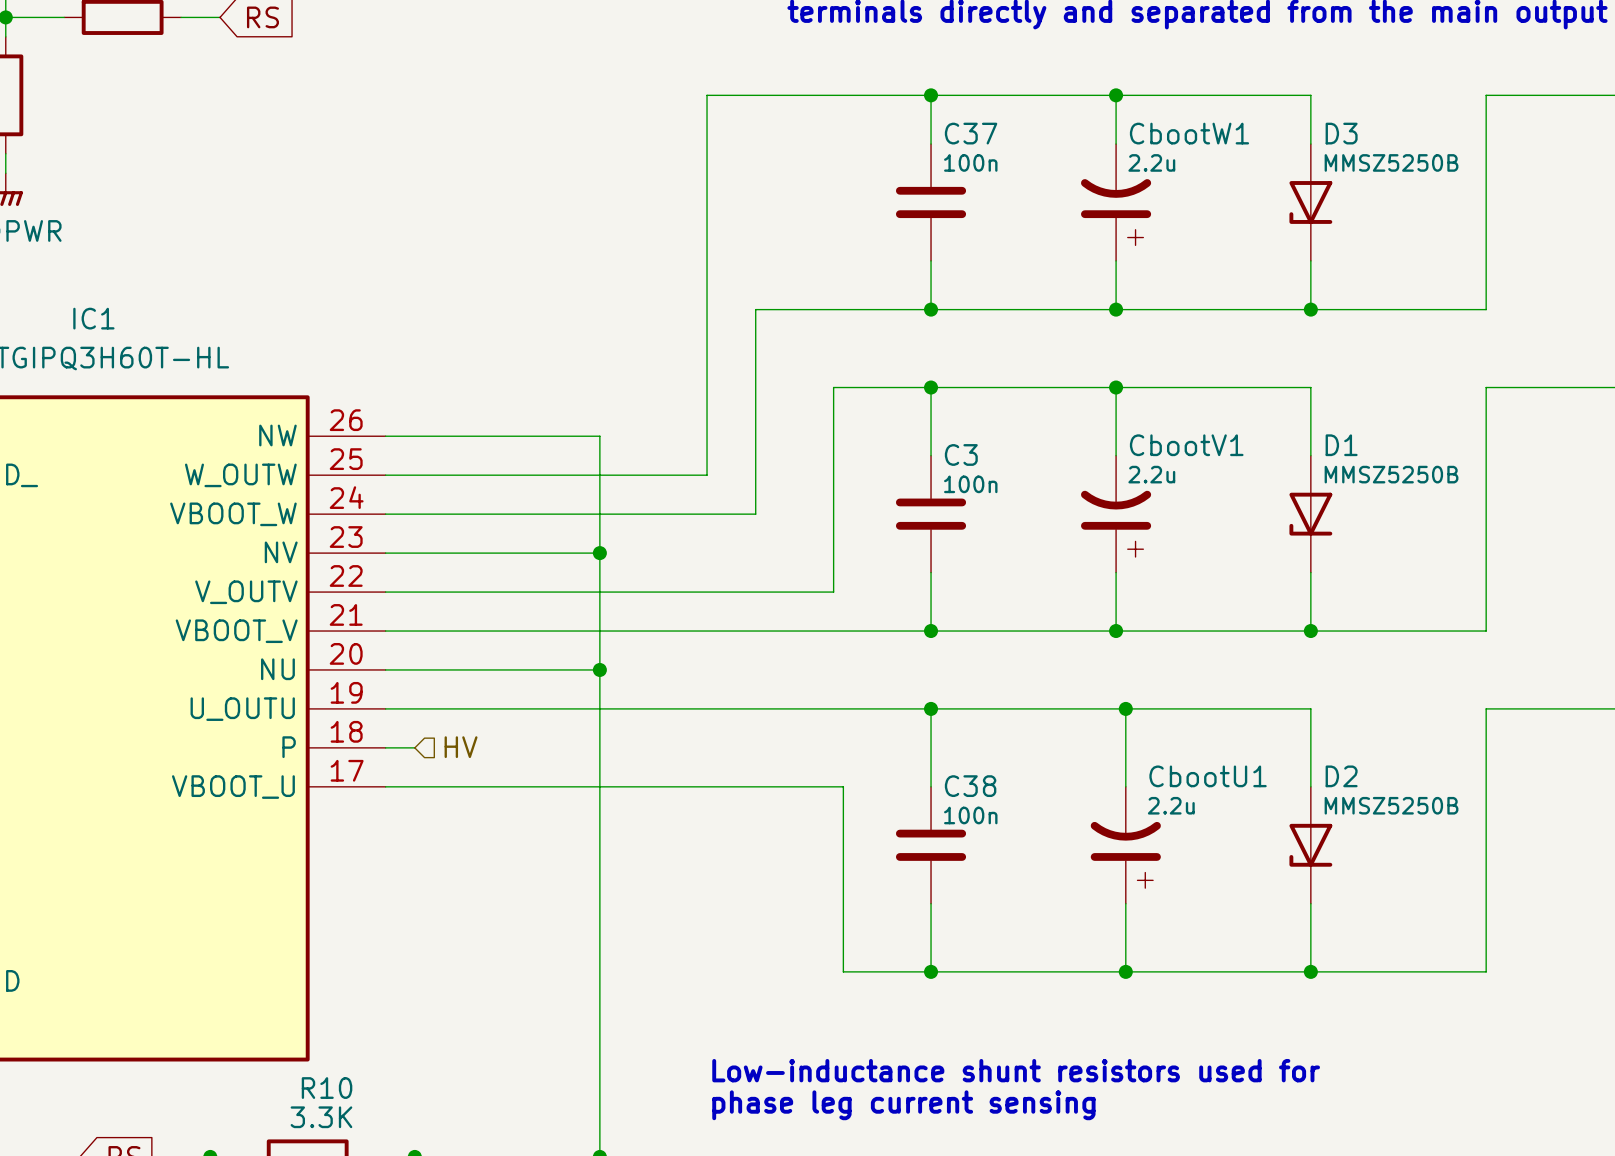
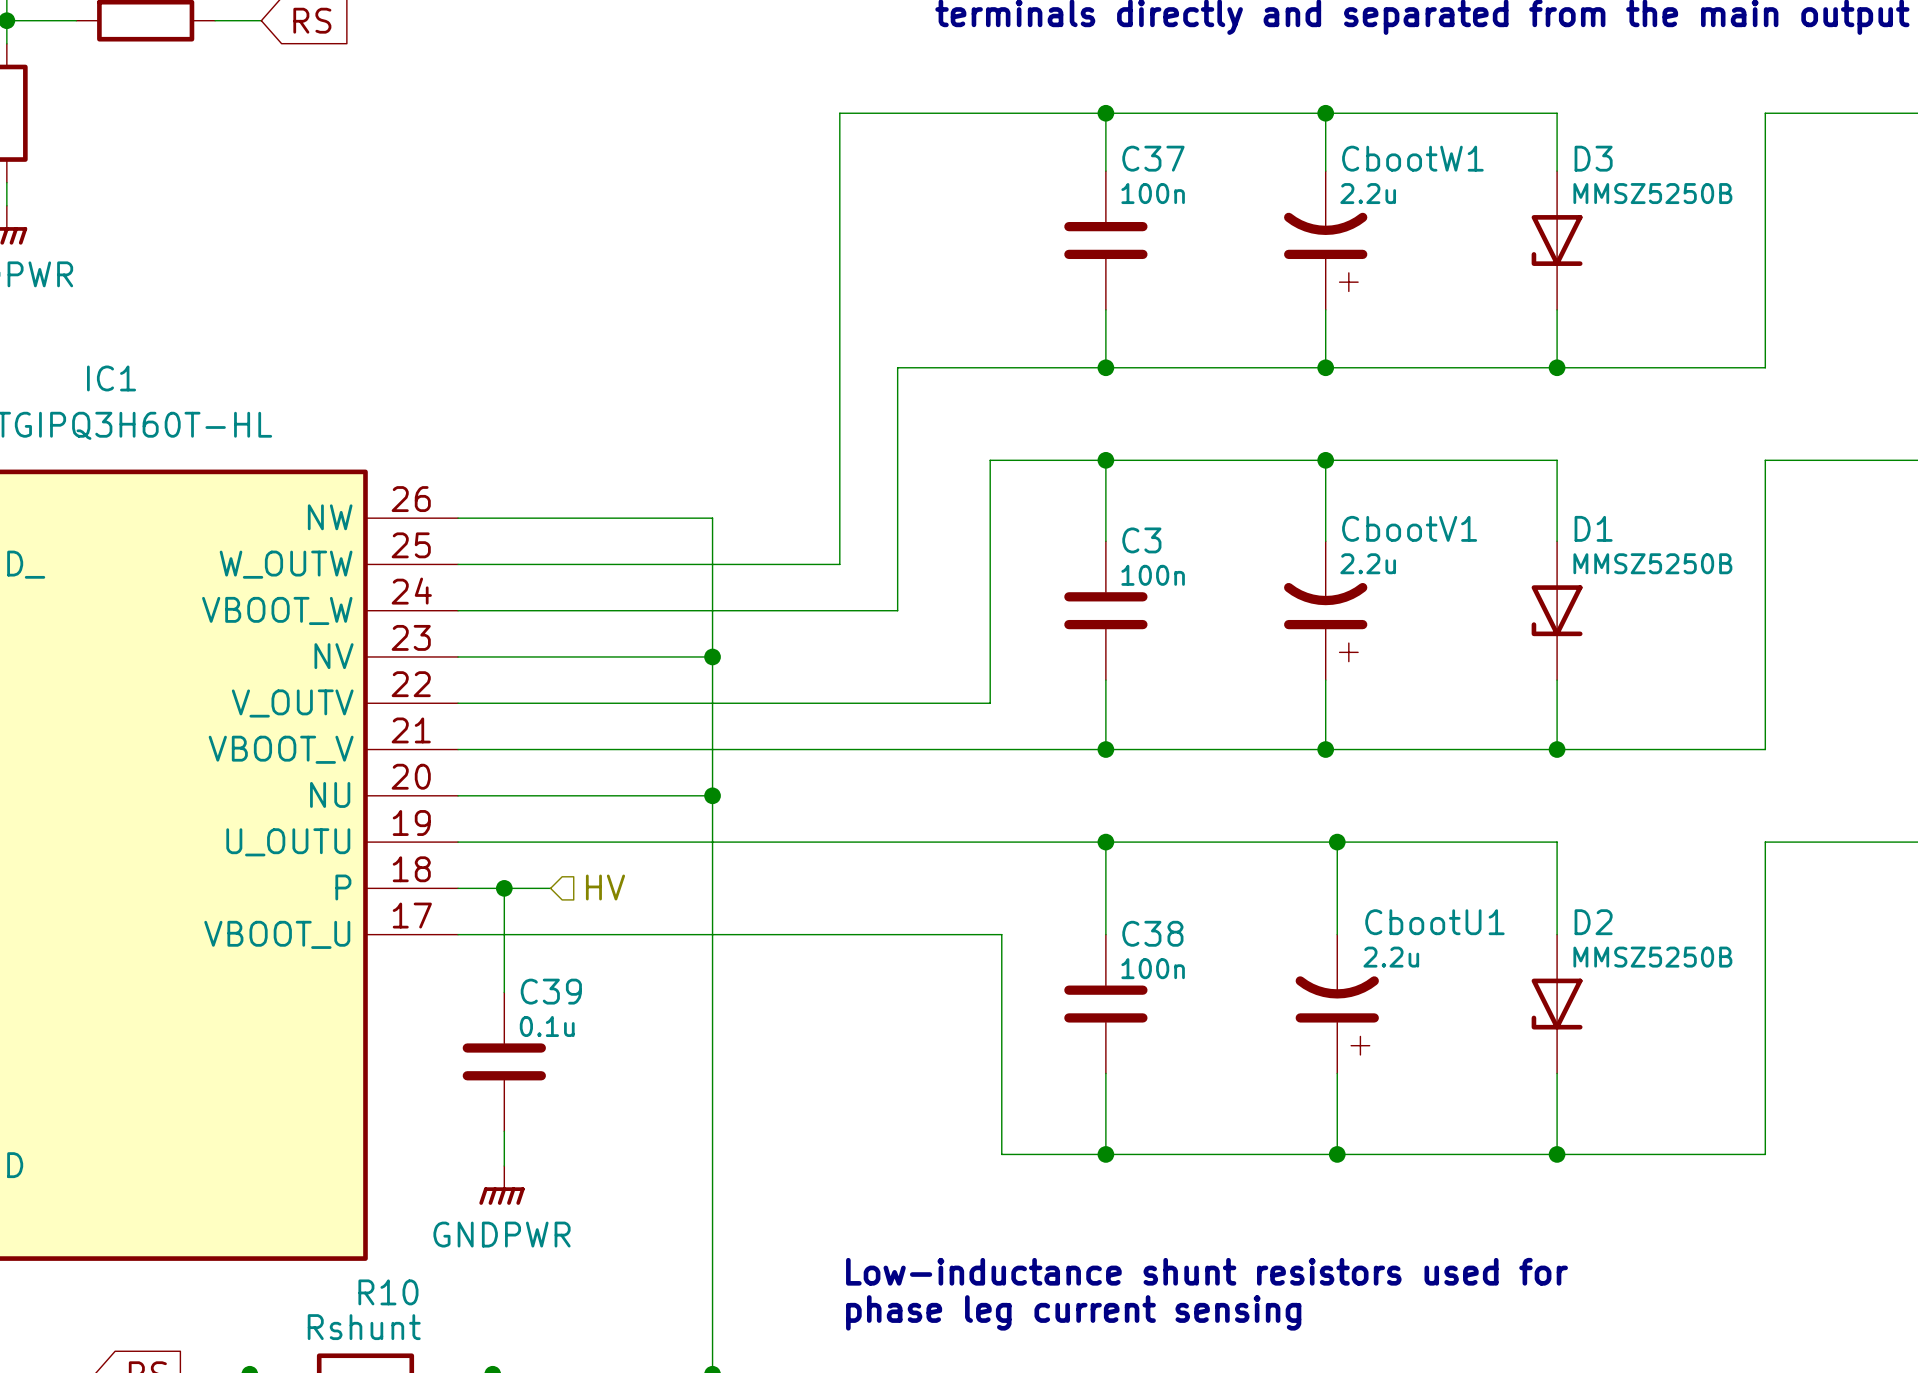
wire: none -> (492, 888) (550, 888)
wire: none -> (504, 888) (504, 992)
junction: none -> (504, 888)
hierarchical label position: HV (461, 747) -> HV (605, 887)
C39: none -> 0.1u (504, 1061)
wire: none -> (504, 1131) (504, 1166)
power symbol: none -> GNDPWR (502, 1185)
R10 value: 3.3K (321, 1117) -> Rshunt (364, 1327)

